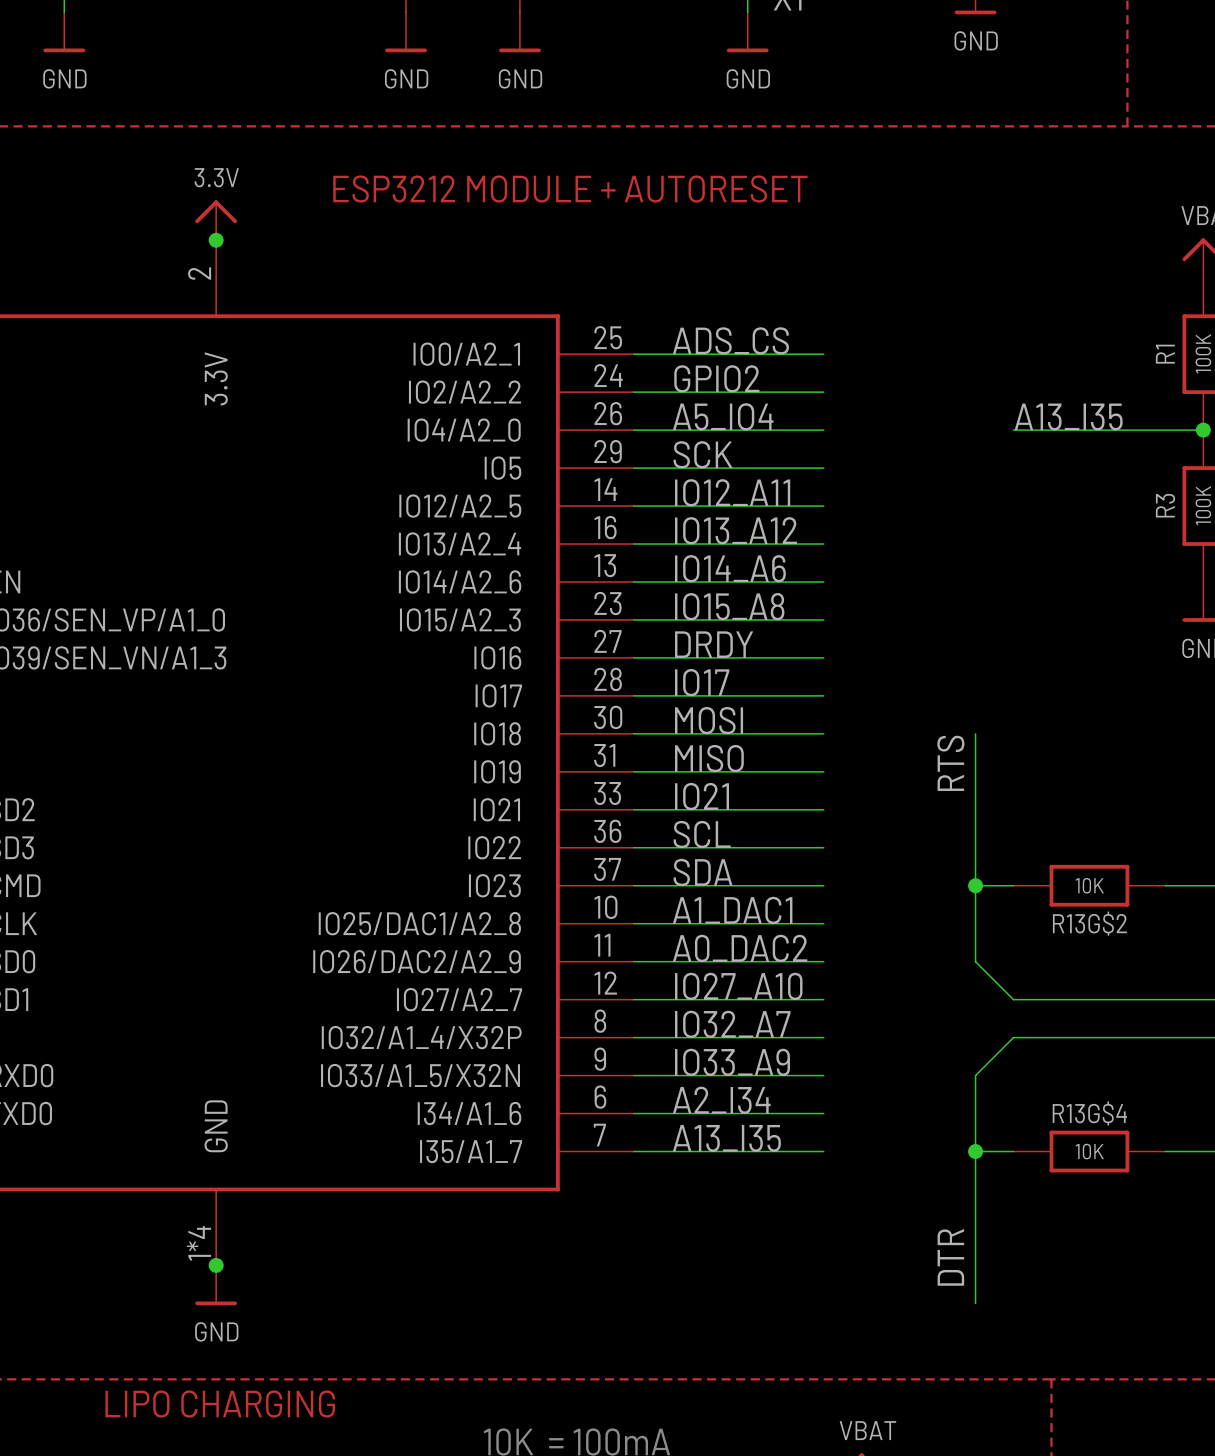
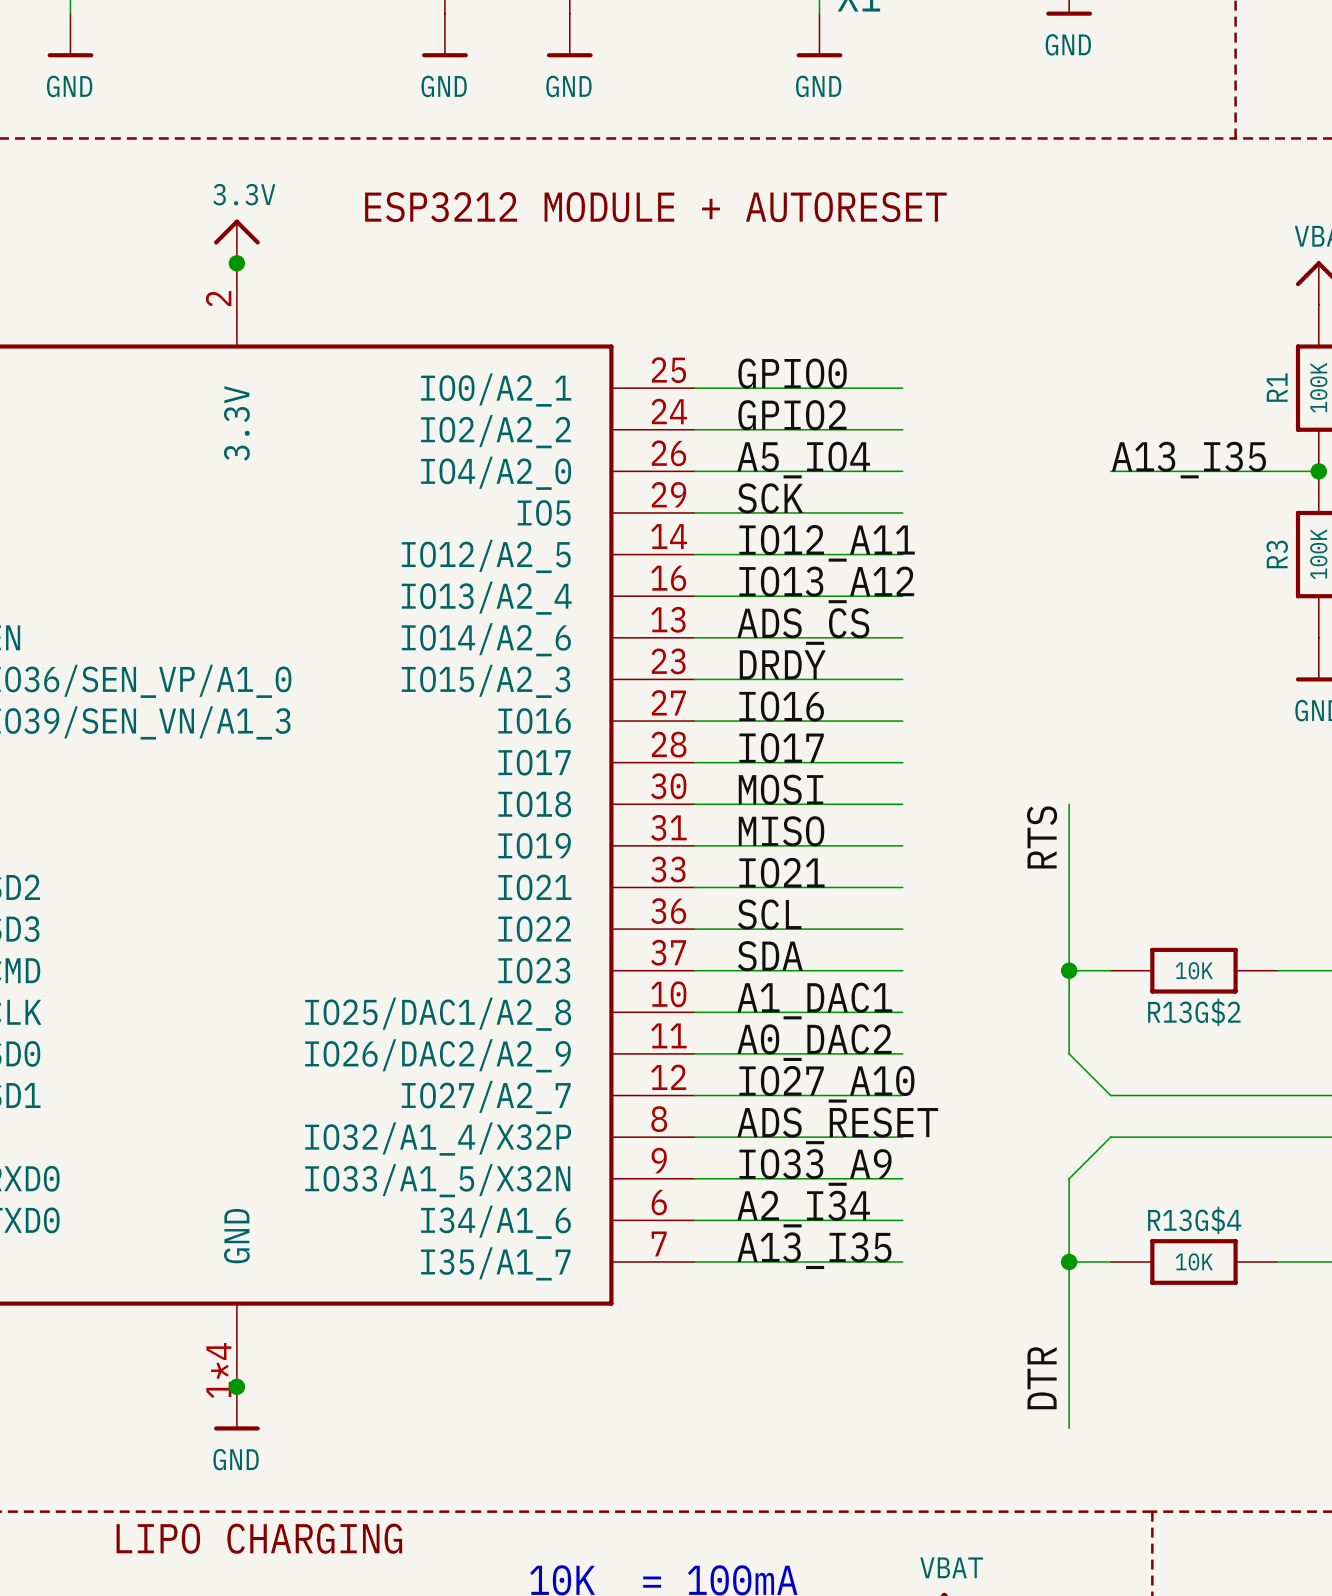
label: ADS_CS (730, 340) -> GPIO0 (792, 373)
label: IO14_A6 (730, 568) -> ADS_CS (803, 626)
label: IO15_A8 (729, 606) -> DRDY (782, 664)
label: DRDY (714, 644) -> IO16 (781, 706)
label: IO32_A7 (732, 1024) -> ADS_RESET (837, 1125)

